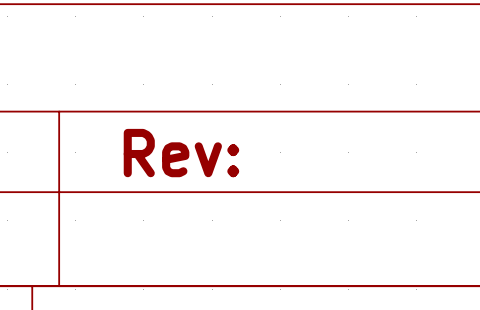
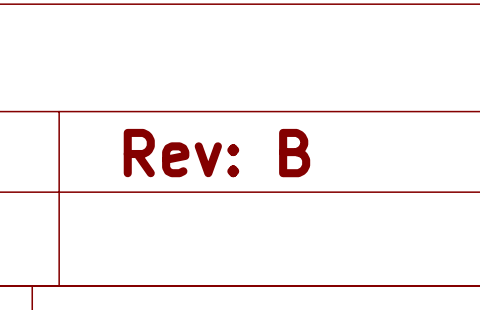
title block: Rev: (181, 153) -> Rev: B (216, 153)

